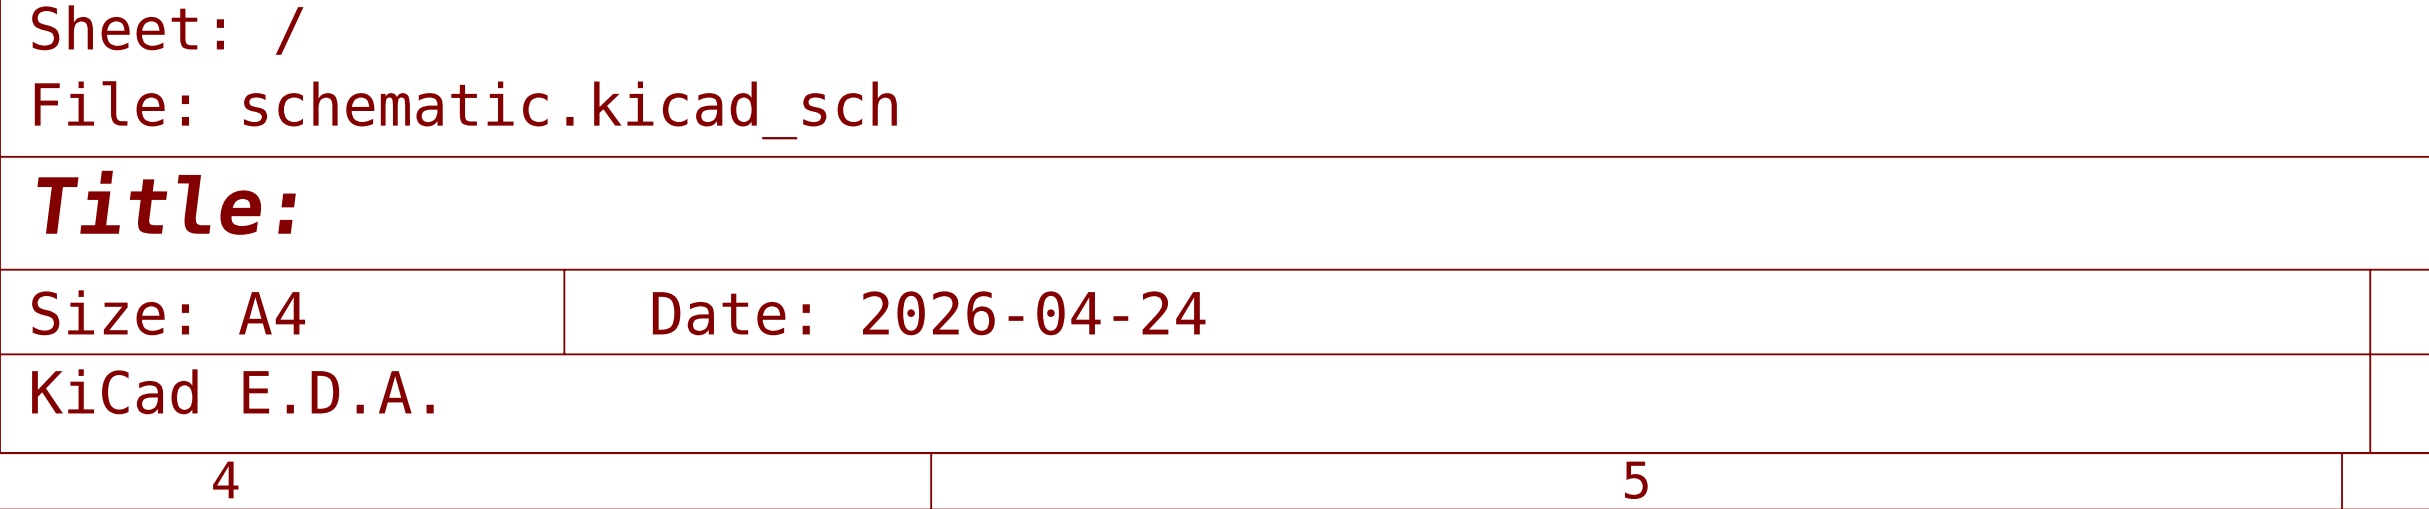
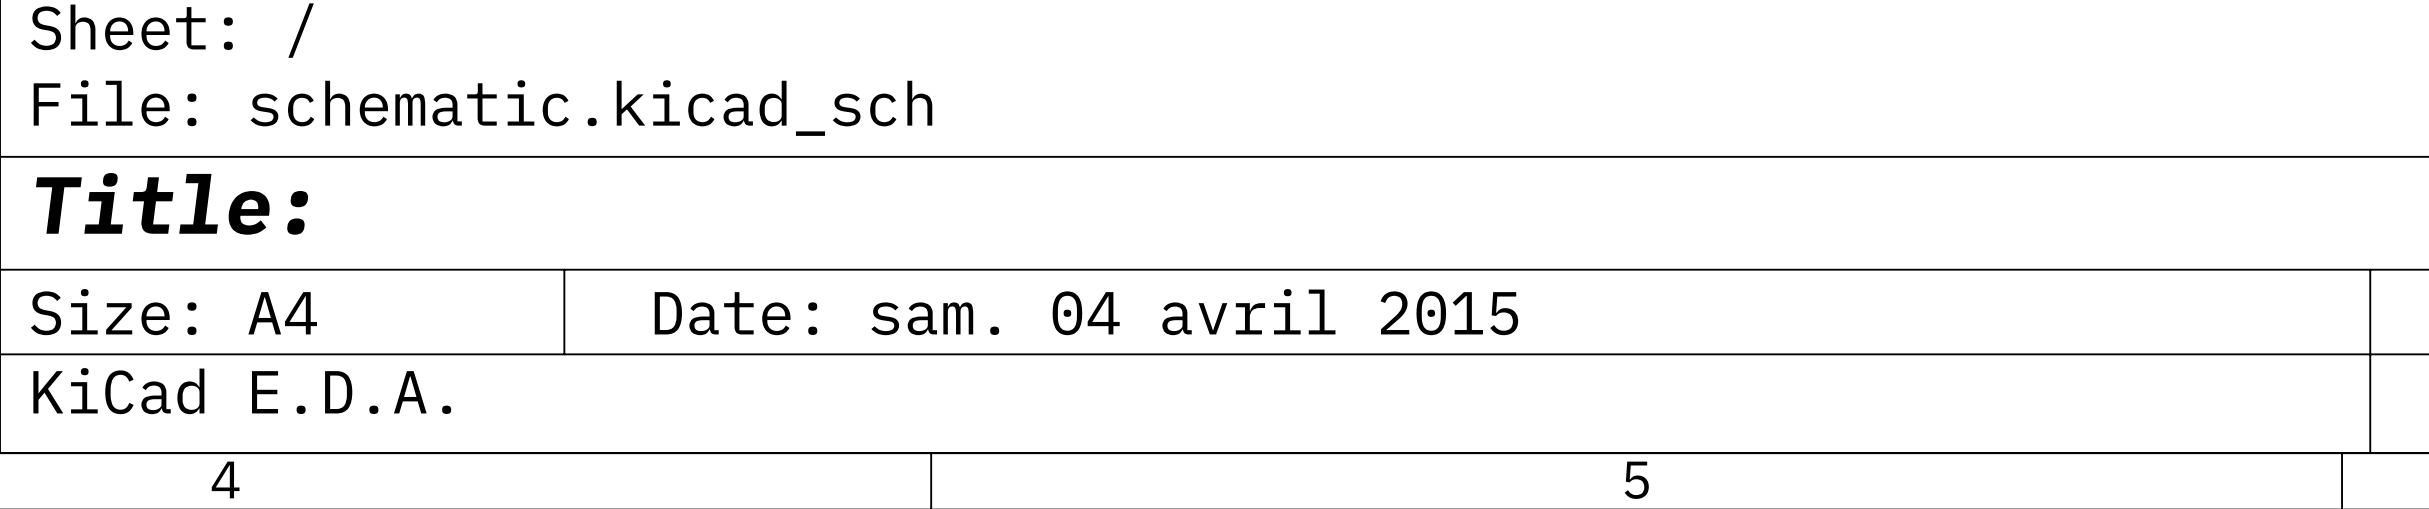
title block: Date: 2026-04-24 (929, 313) -> Date: sam. 04 avril 2015 (1086, 312)

